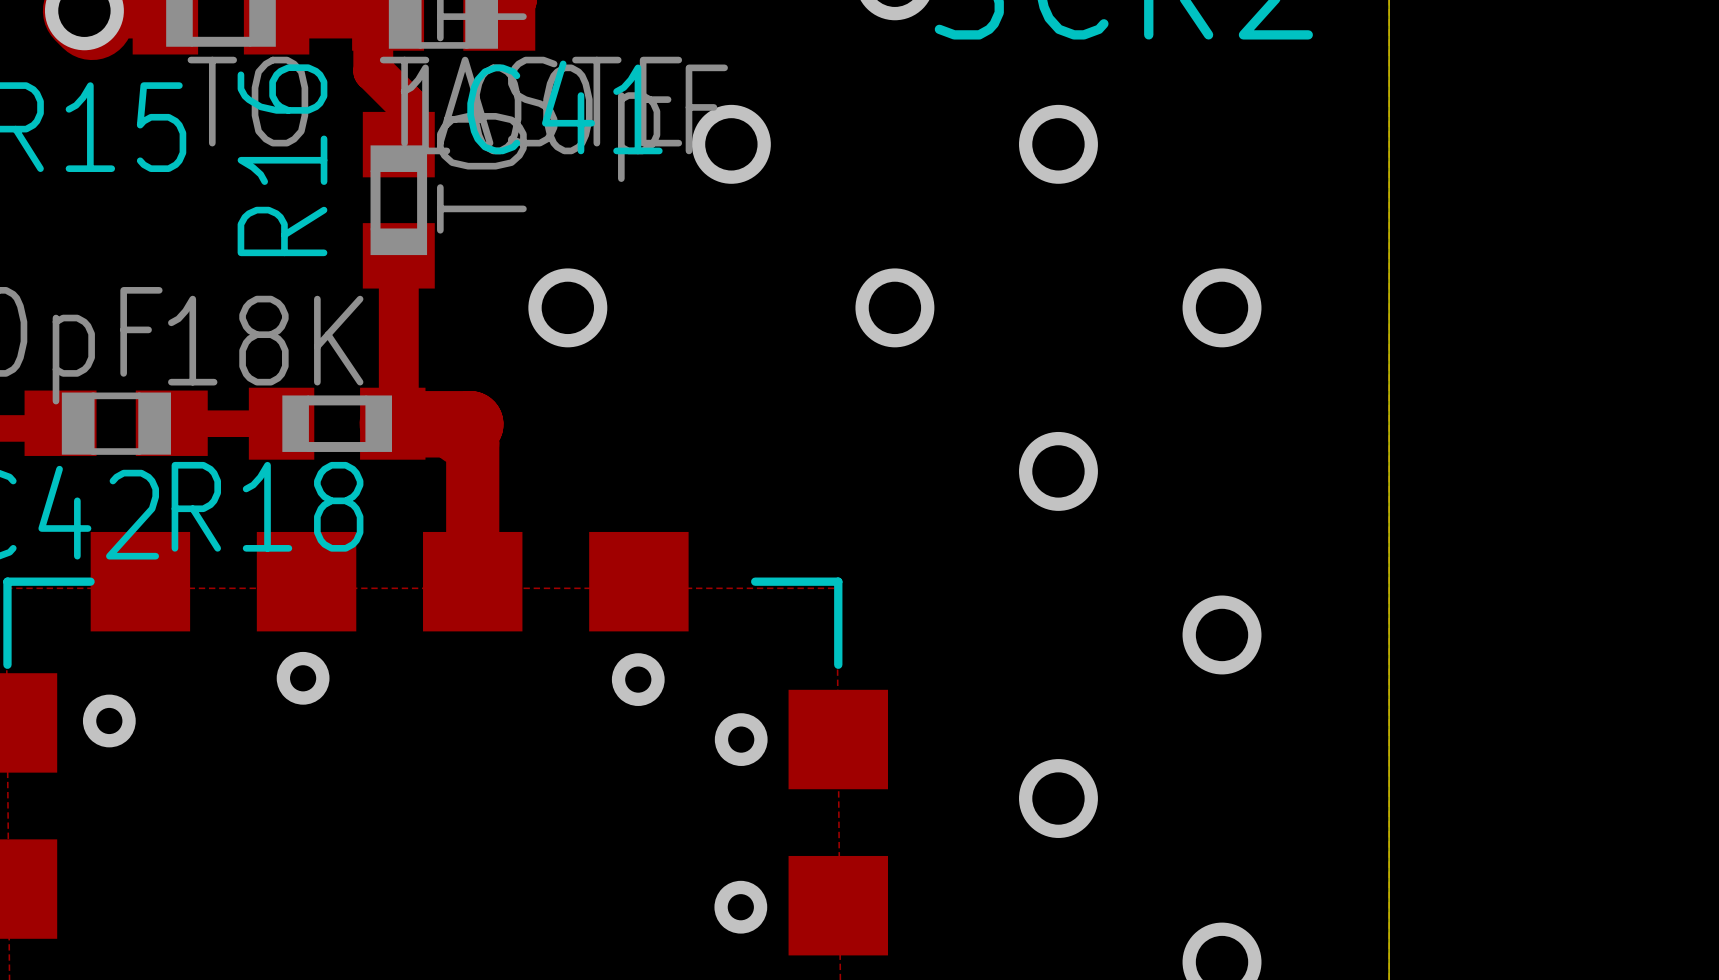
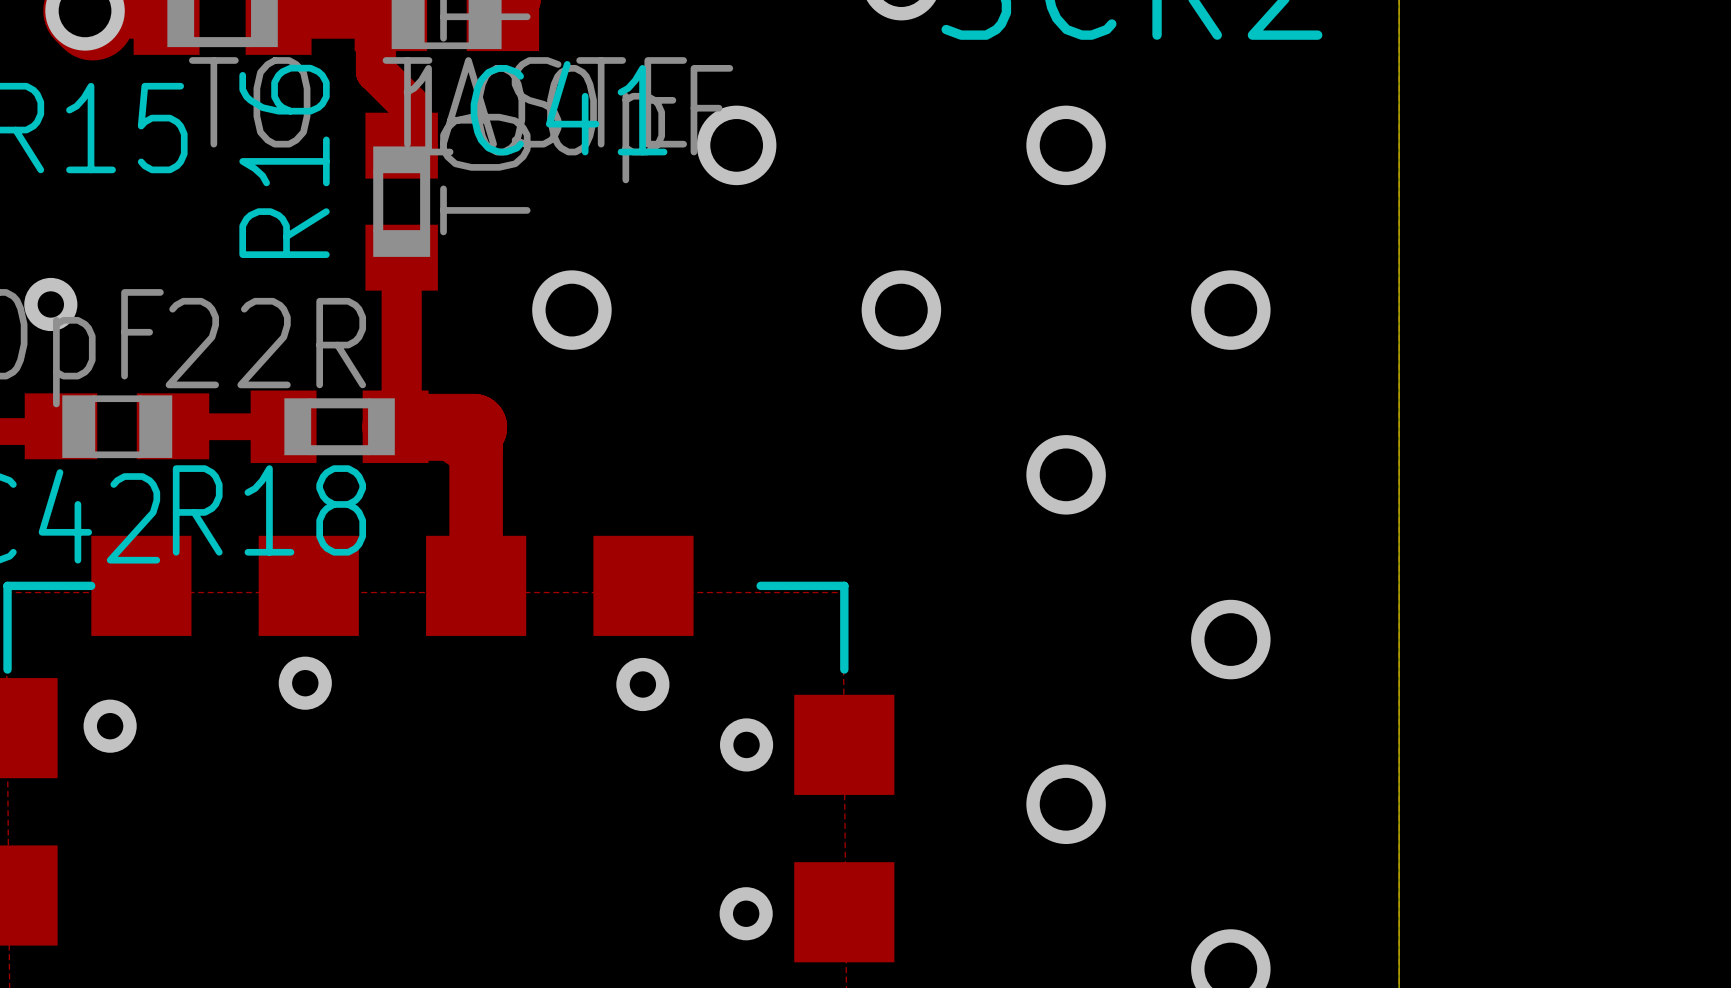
via: none -> (50, 304)
R18 value: 18K (265, 340) -> 22R (265, 343)

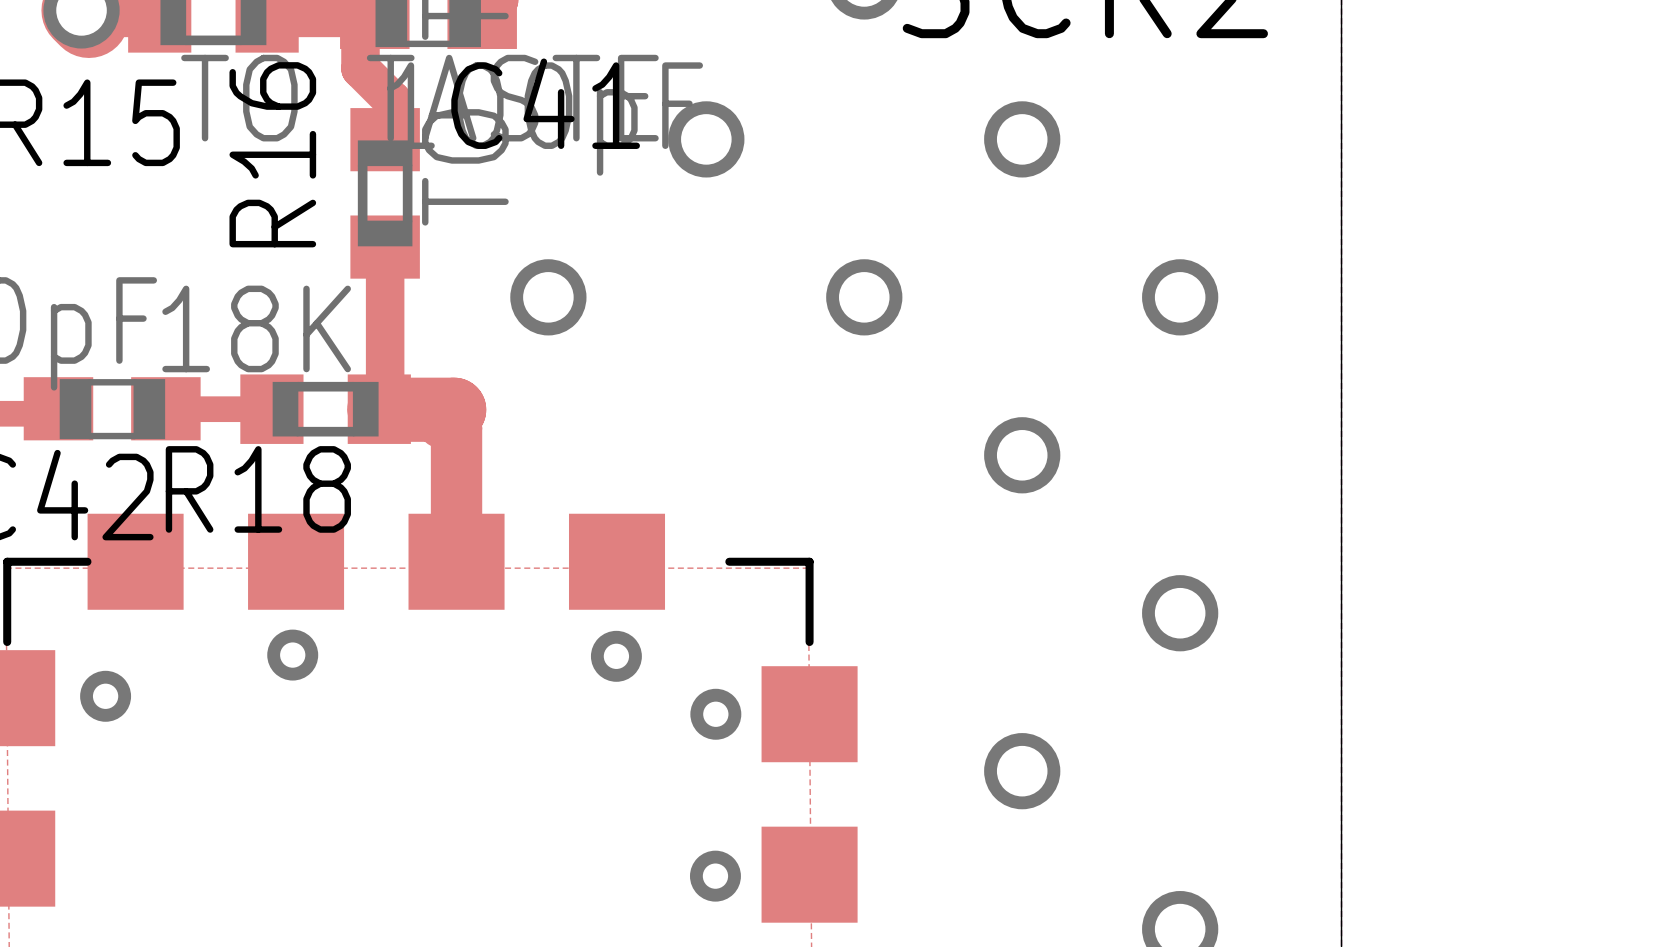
via: (50, 304) -> none
R18 value: 22R (265, 343) -> 18K (256, 328)

